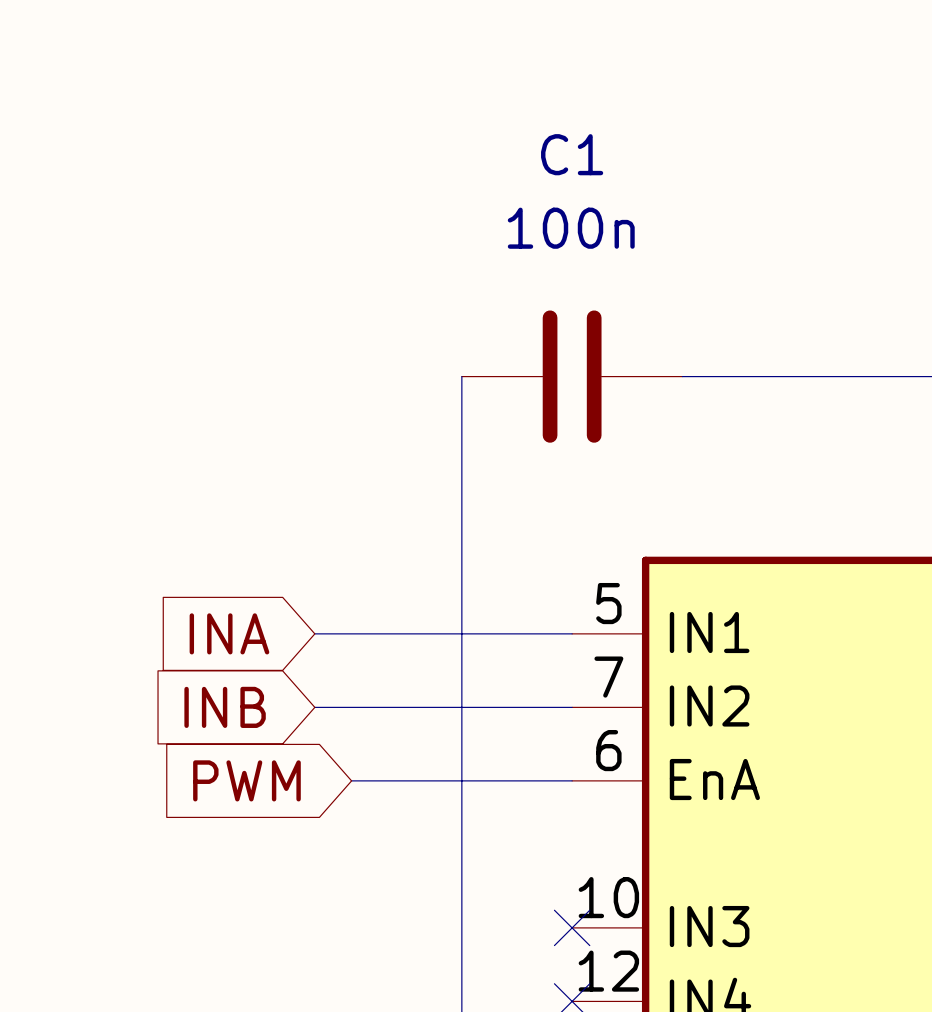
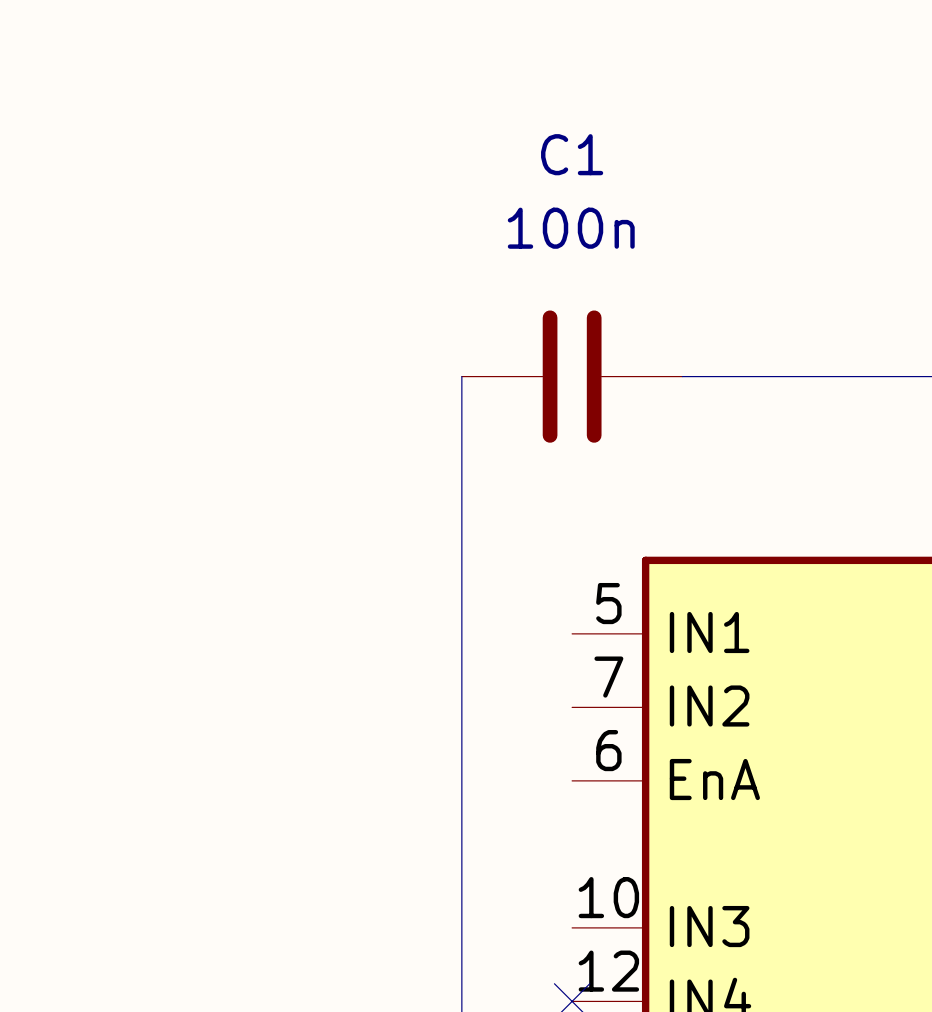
global label: INA (229, 633) -> none
wire: (314, 633) (572, 633) -> none
global label: INB (225, 707) -> none
wire: (314, 707) (572, 707) -> none
global label: PWM (246, 780) -> none
wire: (351, 780) (572, 780) -> none
no-connect mark: (572, 927) -> none

